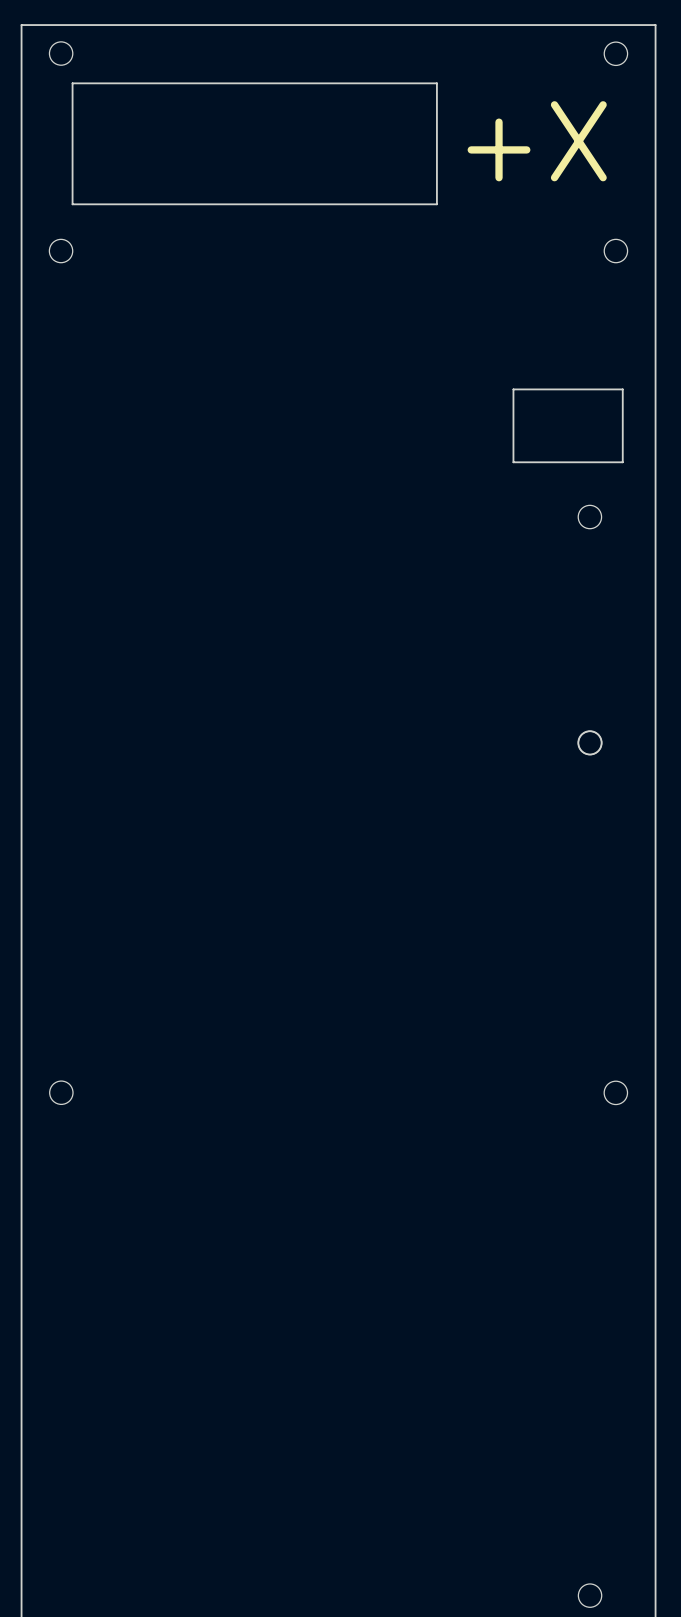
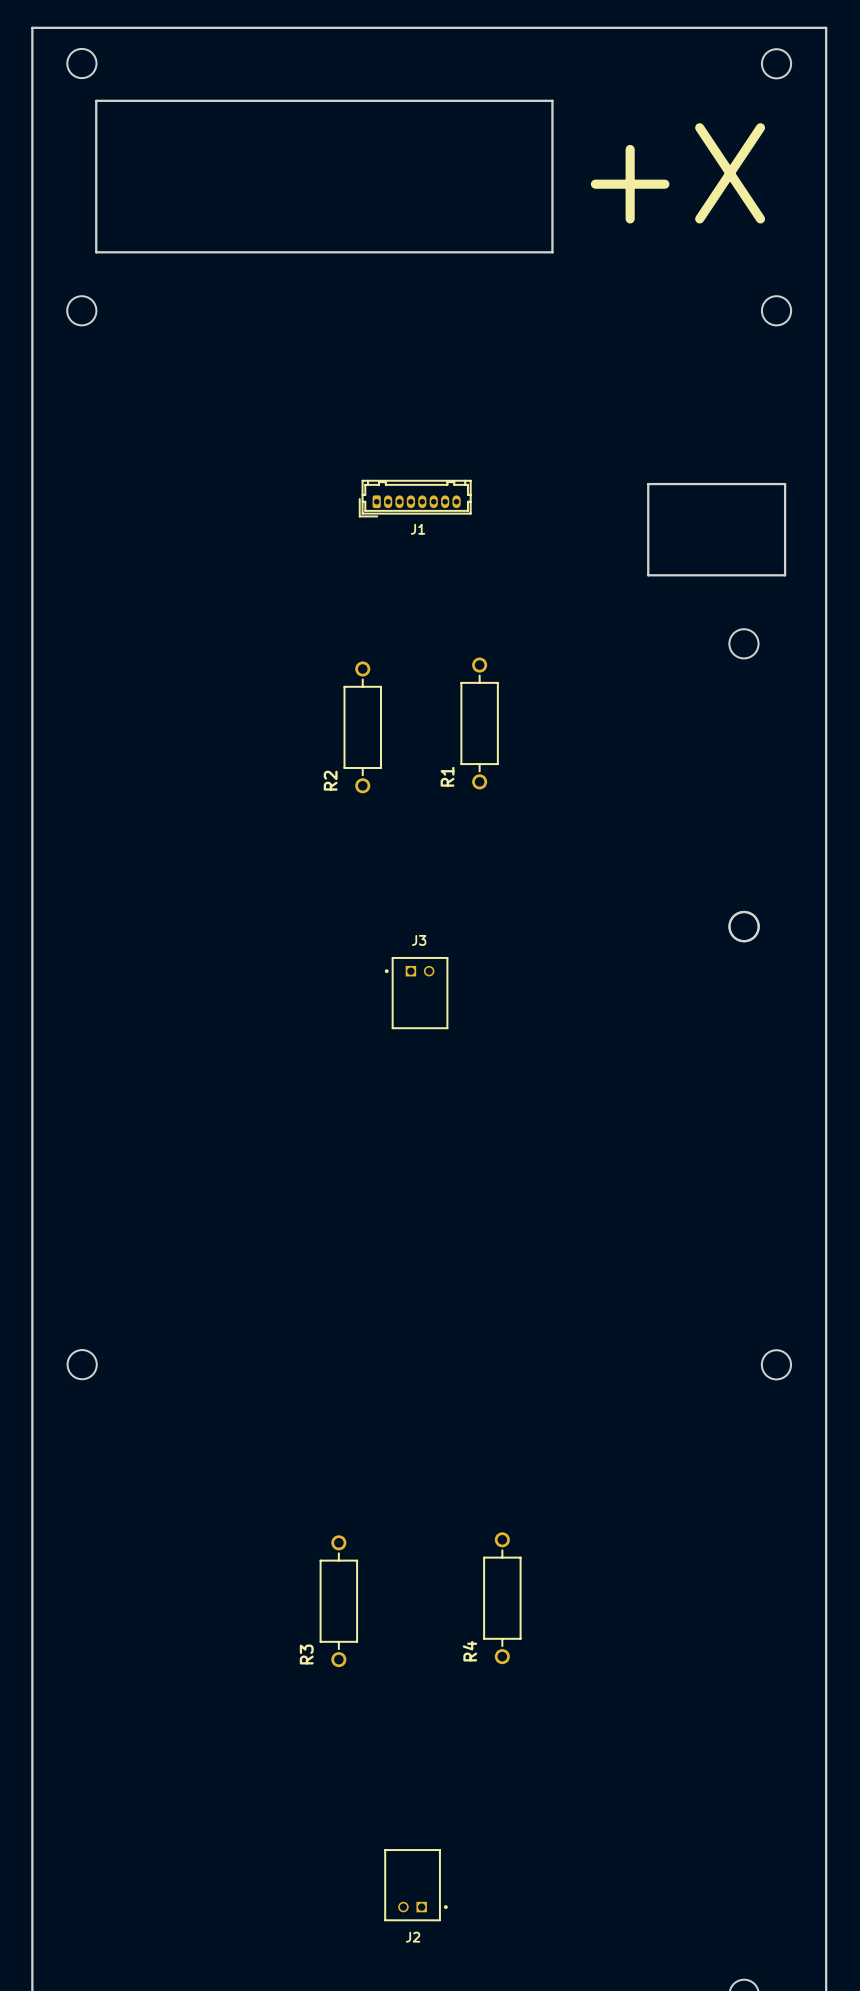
J1: none -> (415, 498)
R1: none -> (479, 723)
R2: none -> (362, 727)
J3: none -> (416, 993)
R4: none -> (502, 1598)
R3: none -> (338, 1601)
J2: none -> (416, 1885)

